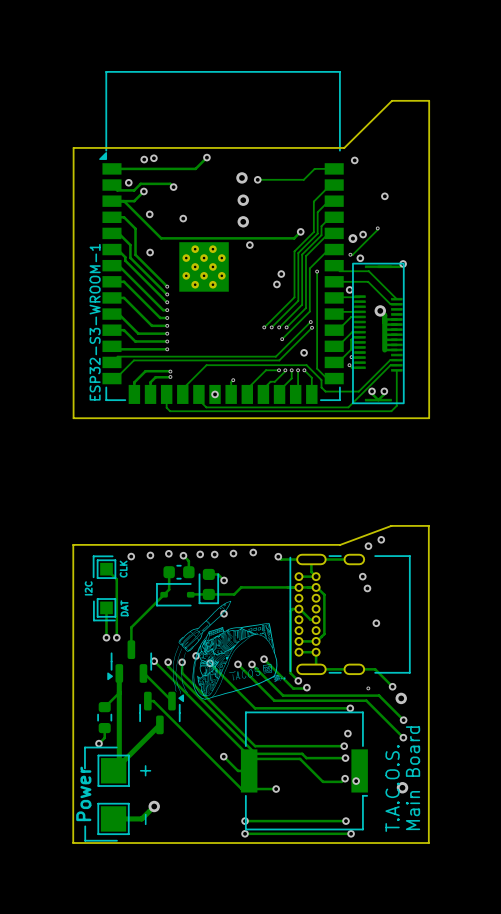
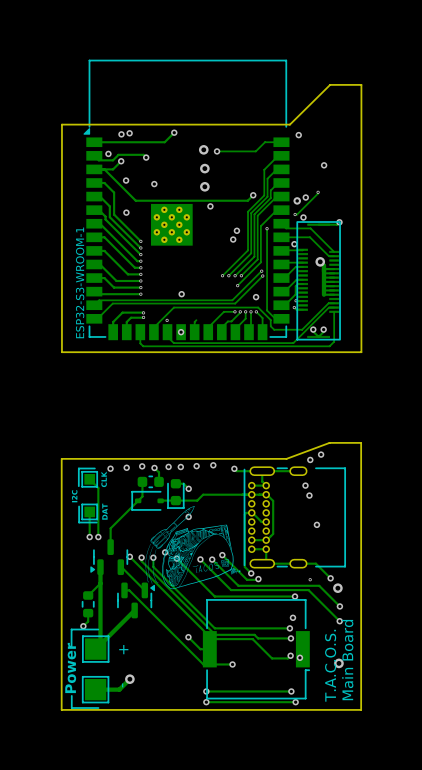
via: none -> (181, 294)
via position: (233, 380) -> (167, 320)

